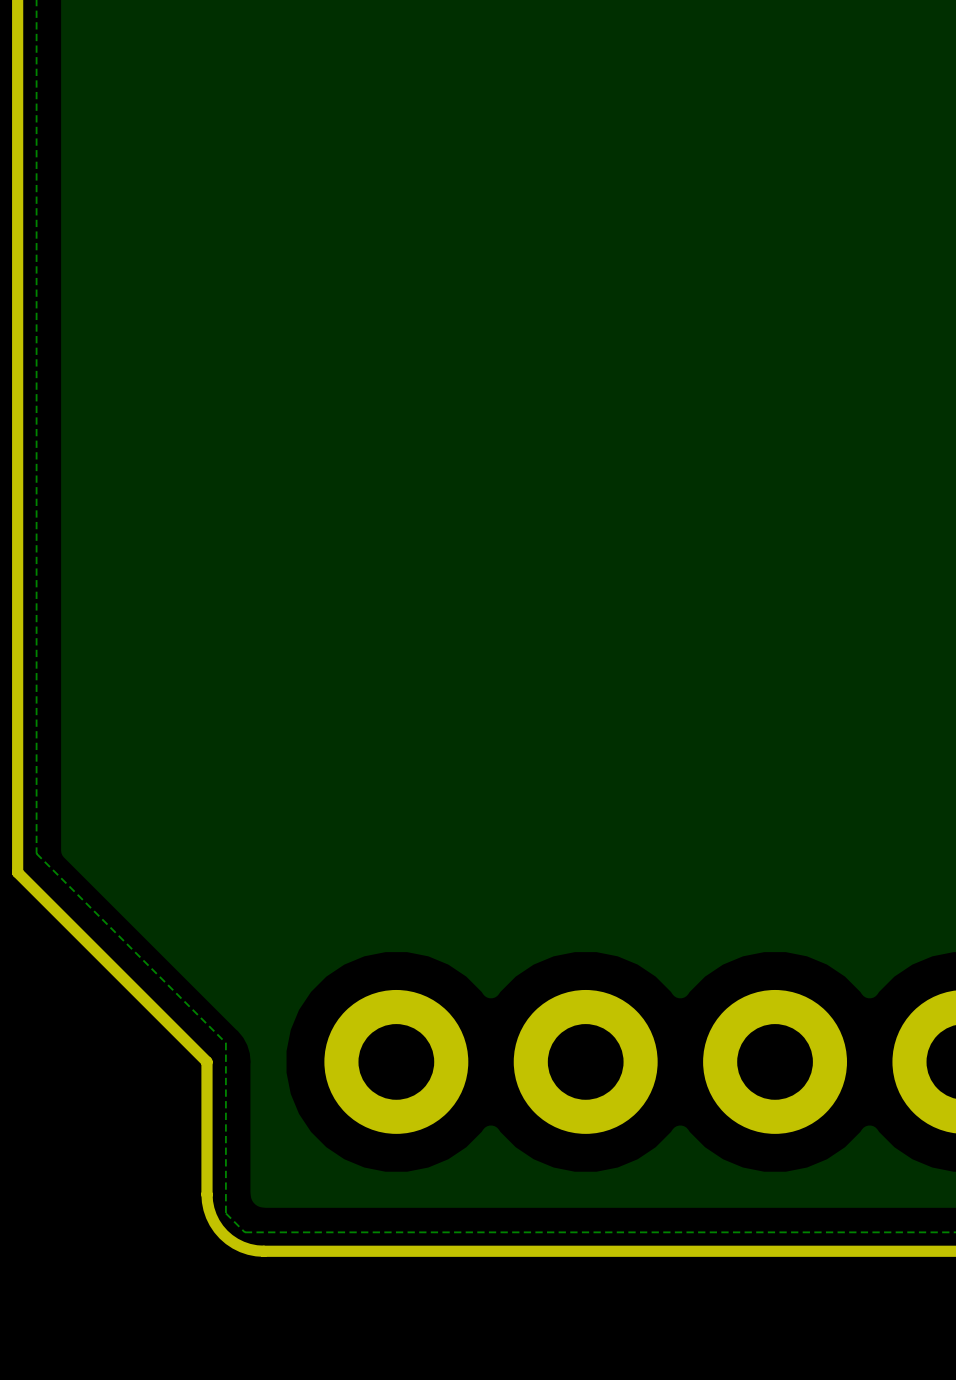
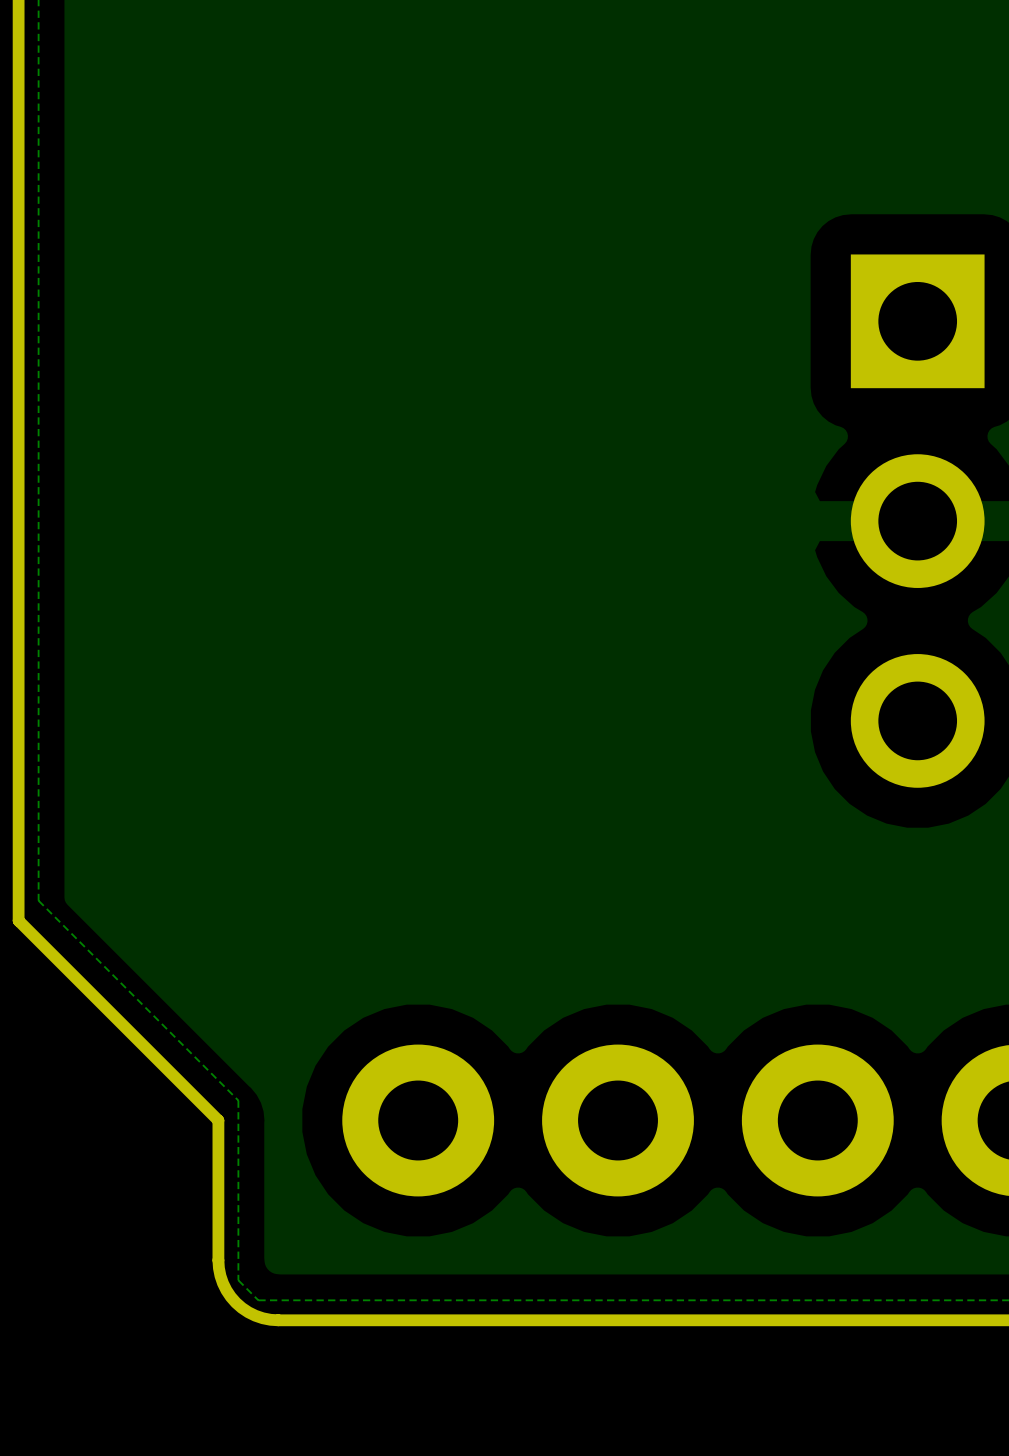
part: none -> (917, 521)

